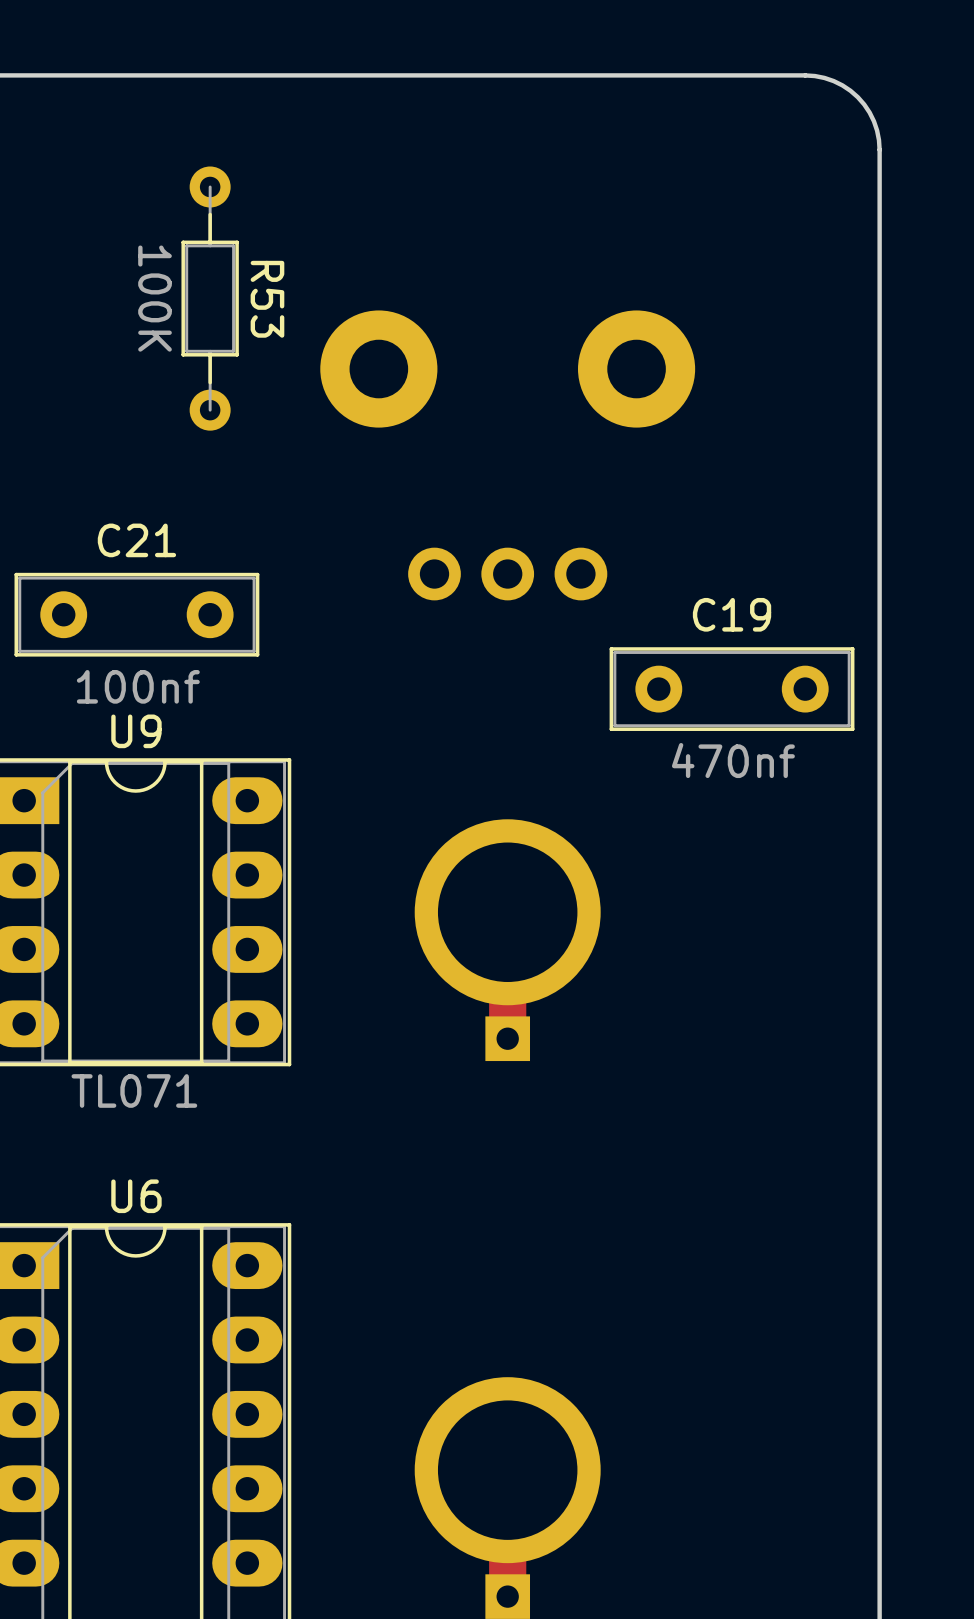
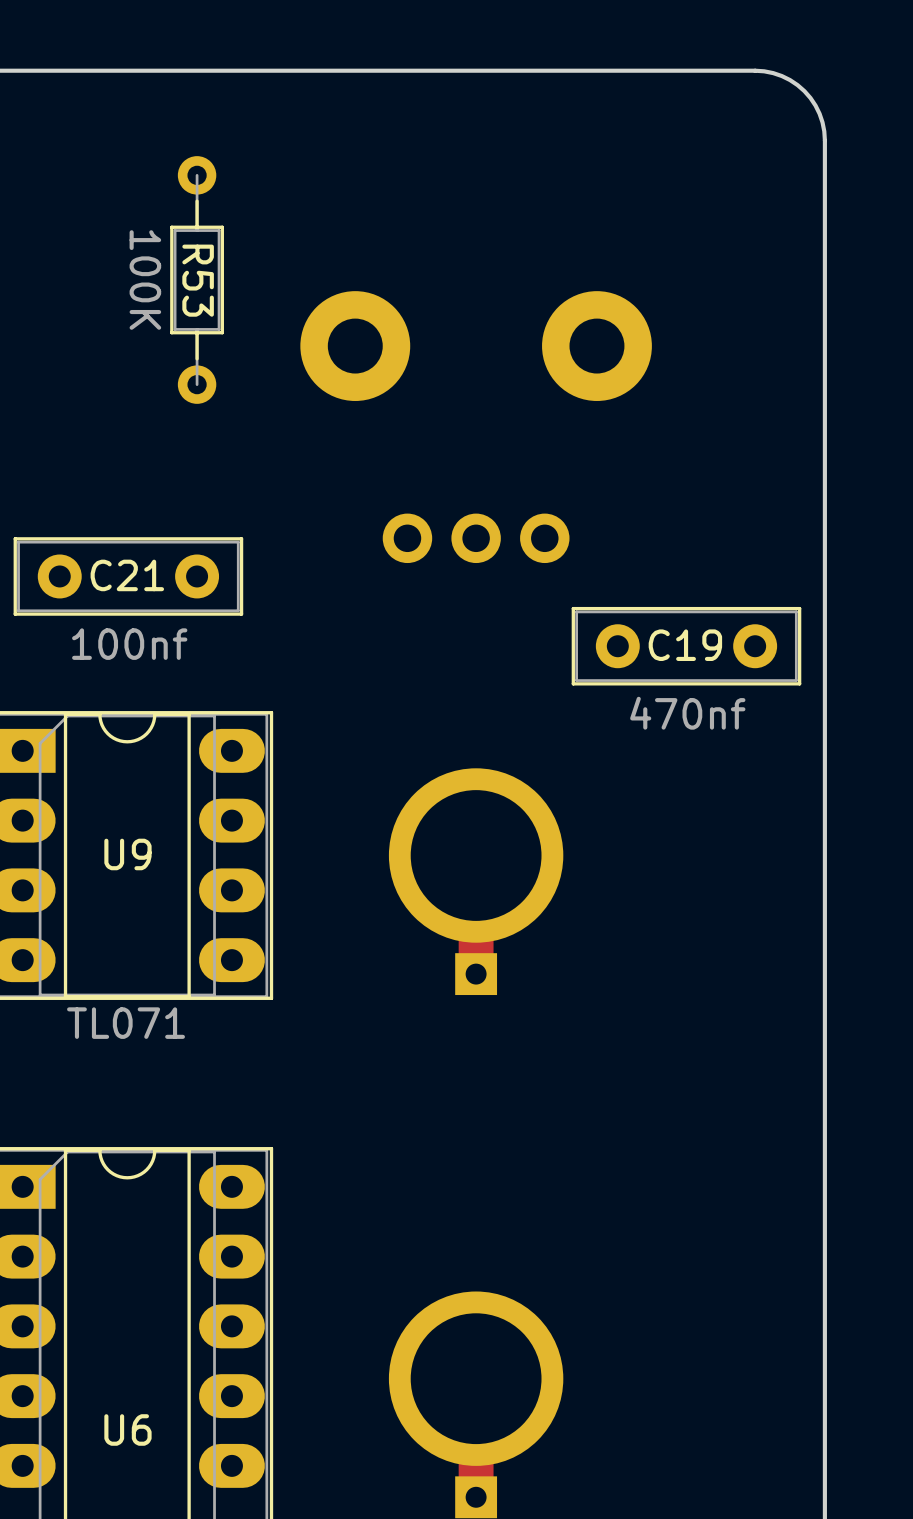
R53 name position: R53 (267, 299) -> R53 (198, 280)
C21 name position: C21 (136, 540) -> C21 (127, 575)
C19 name position: C19 (732, 614) -> C19 (685, 645)
U9 name position: U9 (136, 731) -> U9 (127, 854)
U6 name position: U6 (136, 1196) -> U6 (127, 1429)

